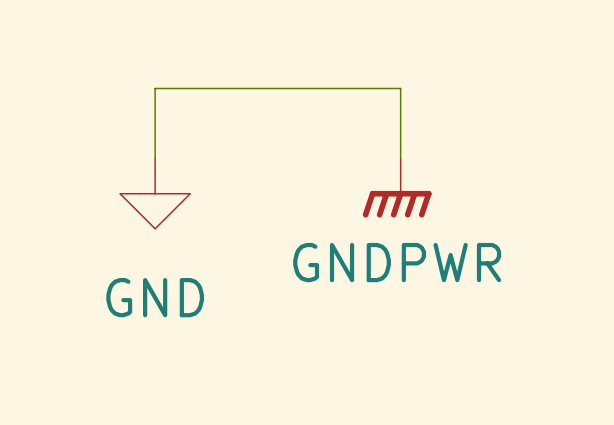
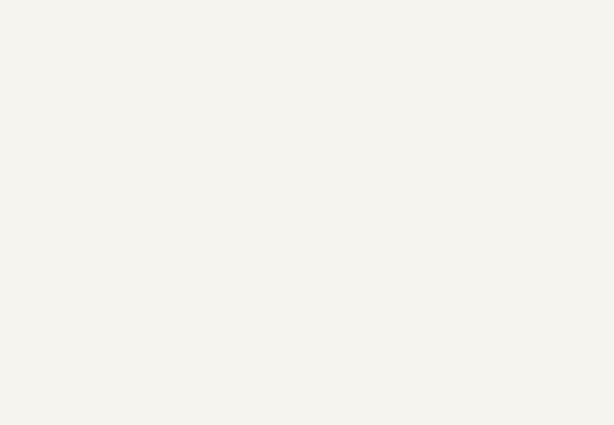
wire: (155, 158) (155, 88) (400, 88) (400, 158) -> none
power symbol: GNDPWR (397, 188) -> none
power symbol: GND (155, 193) -> none

